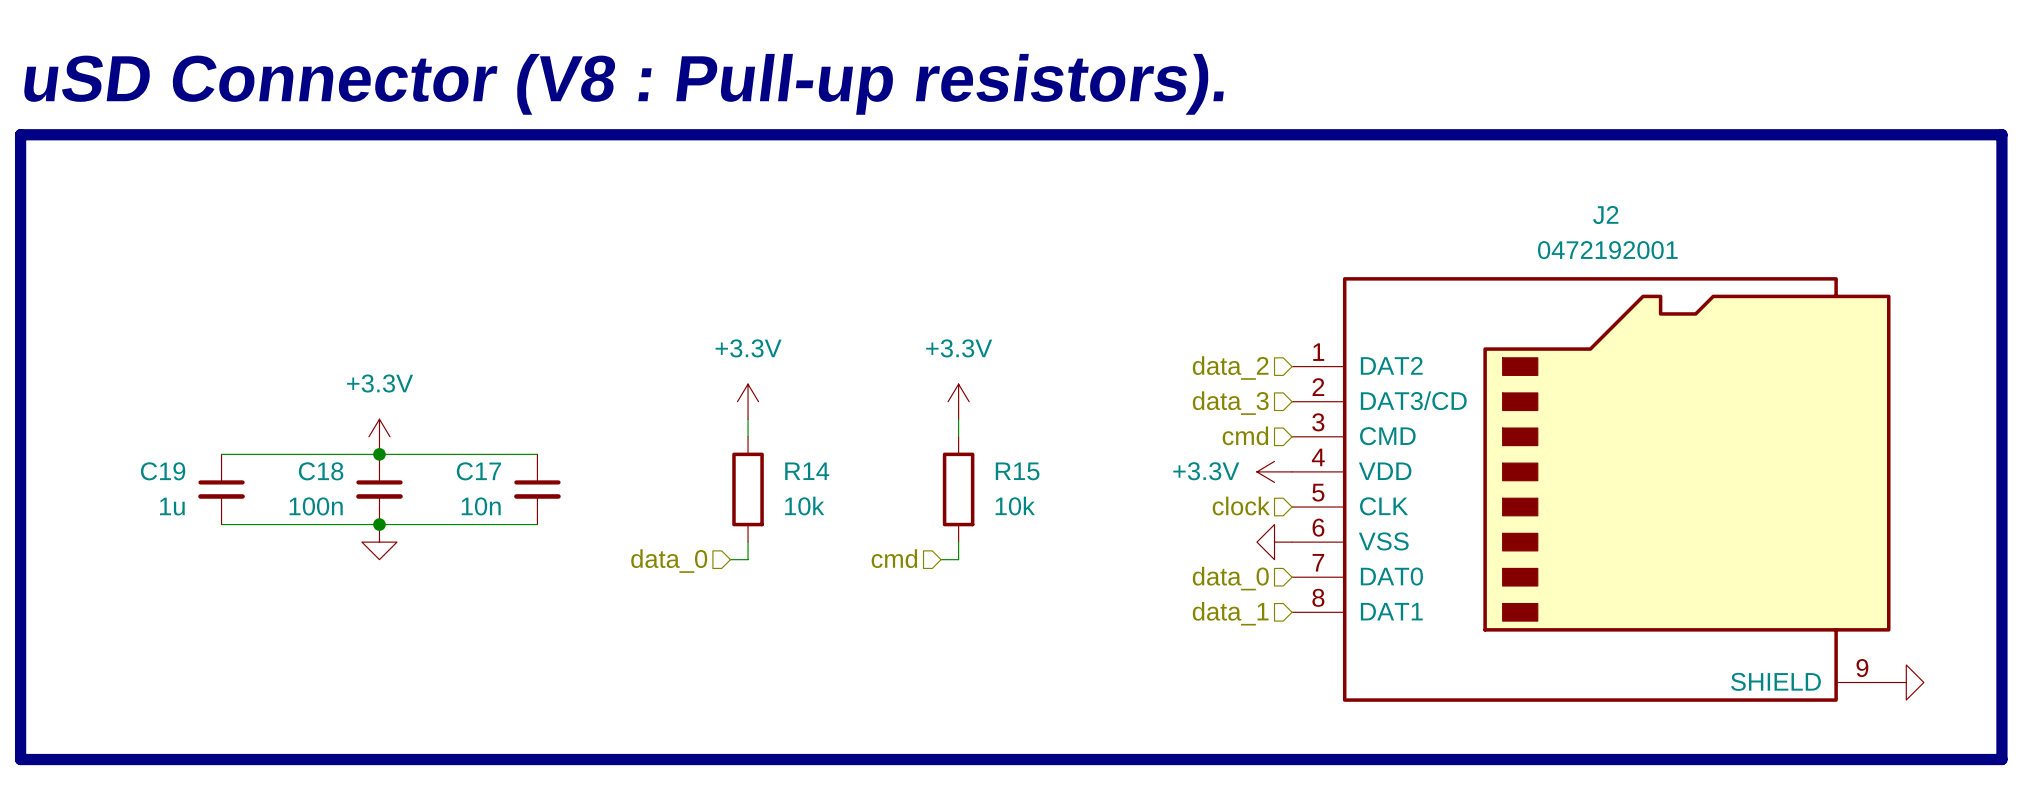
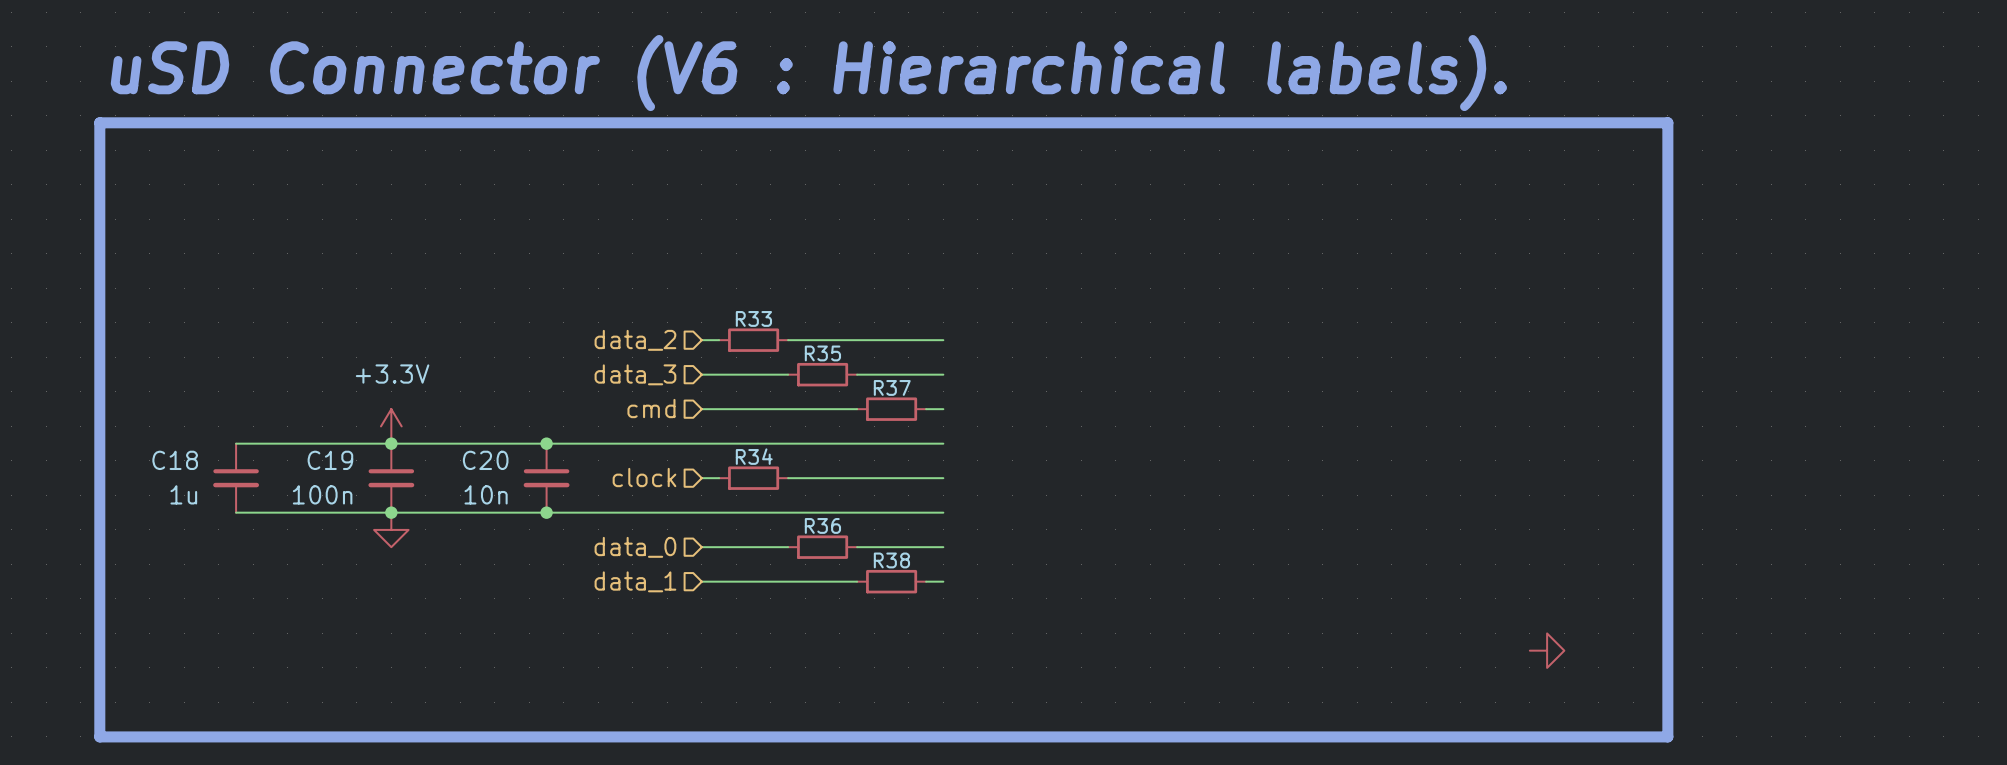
text: uSD Connector (V8 : Pull-up resistors). (623, 84) -> uSD Connector (V6 : Hierarchical labels). (808, 73)
line: (20, 134) (2001, 134) (2001, 759) (20, 759) (20, 134) -> (99, 122) (99, 736) (1667, 736) (1667, 122) (99, 122)
wire: none -> (701, 340) (719, 340)
R33: none -> (753, 340)
wire: none -> (788, 340) (943, 340)
hierarchical label: none -> data_2 (635, 340)
hierarchical label: data_2 (1230, 368) -> none
wire: none -> (701, 374) (788, 374)
R35: none -> (822, 374)
wire: none -> (857, 374) (943, 374)
hierarchical label: none -> data_3 (635, 374)
power symbol: +3.3V (748, 401) -> none
power symbol: +3.3V (958, 401) -> none
hierarchical label: data_3 (1230, 403) -> none
wire: none -> (701, 409) (857, 409)
wire: (748, 419) (748, 436) -> none
R37: none -> (891, 409)
wire: none -> (926, 409) (943, 409)
wire: (958, 419) (958, 436) -> none
hierarchical label: cmd (1245, 435) -> none
wire: none -> (546, 443) (943, 443)
junction: none -> (546, 443)
C19 name: C19 (163, 471) -> C18 (175, 460)
C18 name: C18 (321, 471) -> C19 (330, 460)
C17 name: C17 (478, 471) -> C20 (485, 460)
power symbol: +3.3V (1274, 471) -> none
hierarchical label: none -> clock (644, 477)
wire: none -> (701, 478) (719, 478)
R14: 10k (748, 489) -> none
R34: none -> (753, 478)
wire: none -> (788, 478) (943, 478)
R15: 10k (958, 489) -> none
J2: 0472192001 (1591, 489) -> none
hierarchical label: clock (1241, 506) -> none
wire: none -> (546, 512) (943, 512)
junction: none -> (546, 512)
wire: (748, 542) (748, 559) -> (788, 547) (753, 547)
wire: (958, 542) (958, 559) (941, 559) -> (857, 547) (943, 547)
power symbol: (1274, 542) -> none
hierarchical label position: cmd (894, 558) -> cmd (651, 408)
wire: none -> (701, 547) (736, 547)
R36: none -> (822, 547)
hierarchical label position: data_0 (669, 561) -> data_0 (635, 547)
hierarchical label: data_0 (1230, 578) -> none
wire: none -> (701, 581) (857, 581)
R38: none -> (891, 581)
wire: none -> (926, 581) (943, 581)
hierarchical label: none -> data_1 (635, 581)
hierarchical label: data_1 (1230, 613) -> none
power symbol: none -> (1547, 650)
power symbol: (1906, 682) -> none

